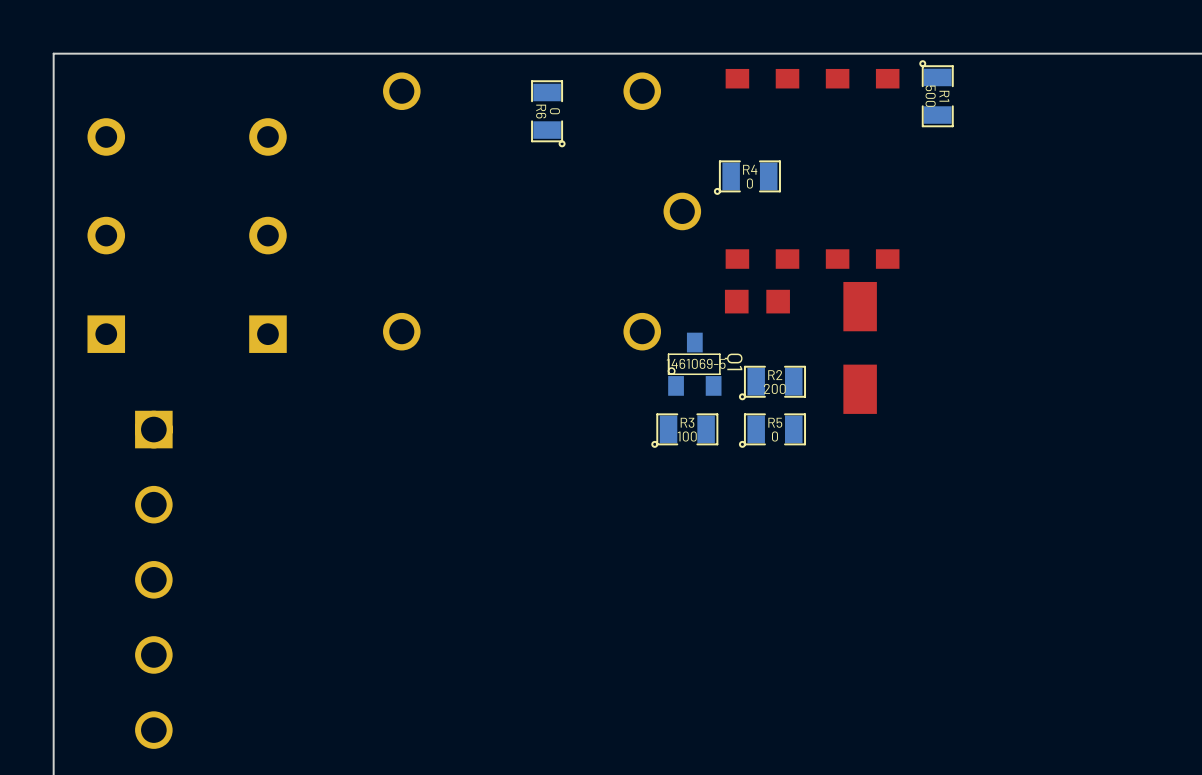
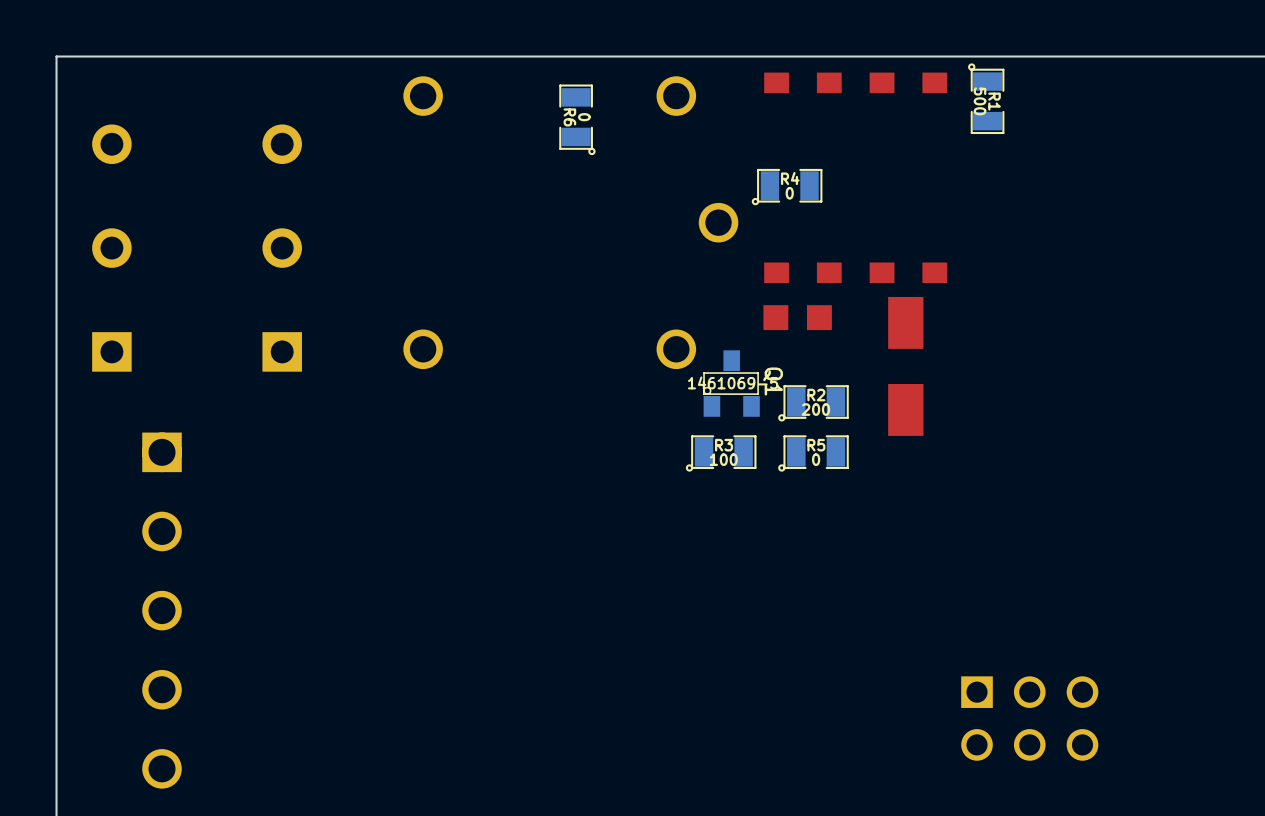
part: none -> (1029, 718)

